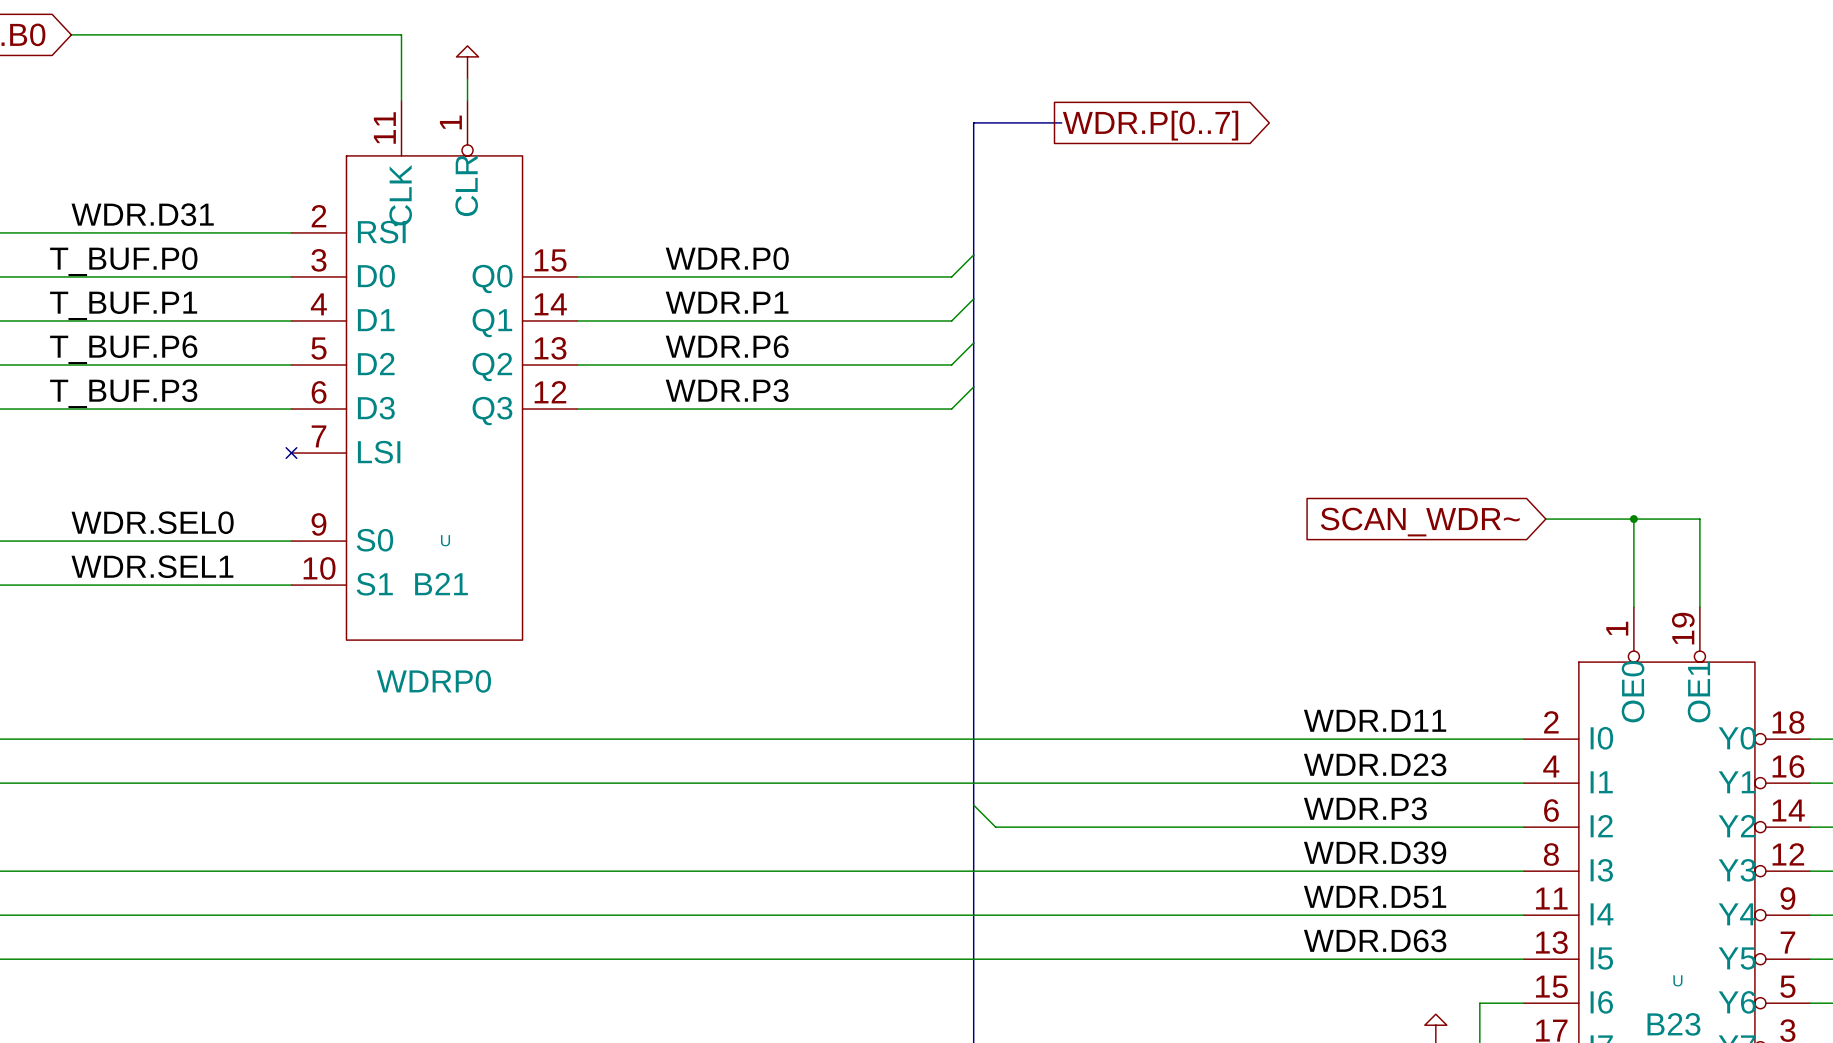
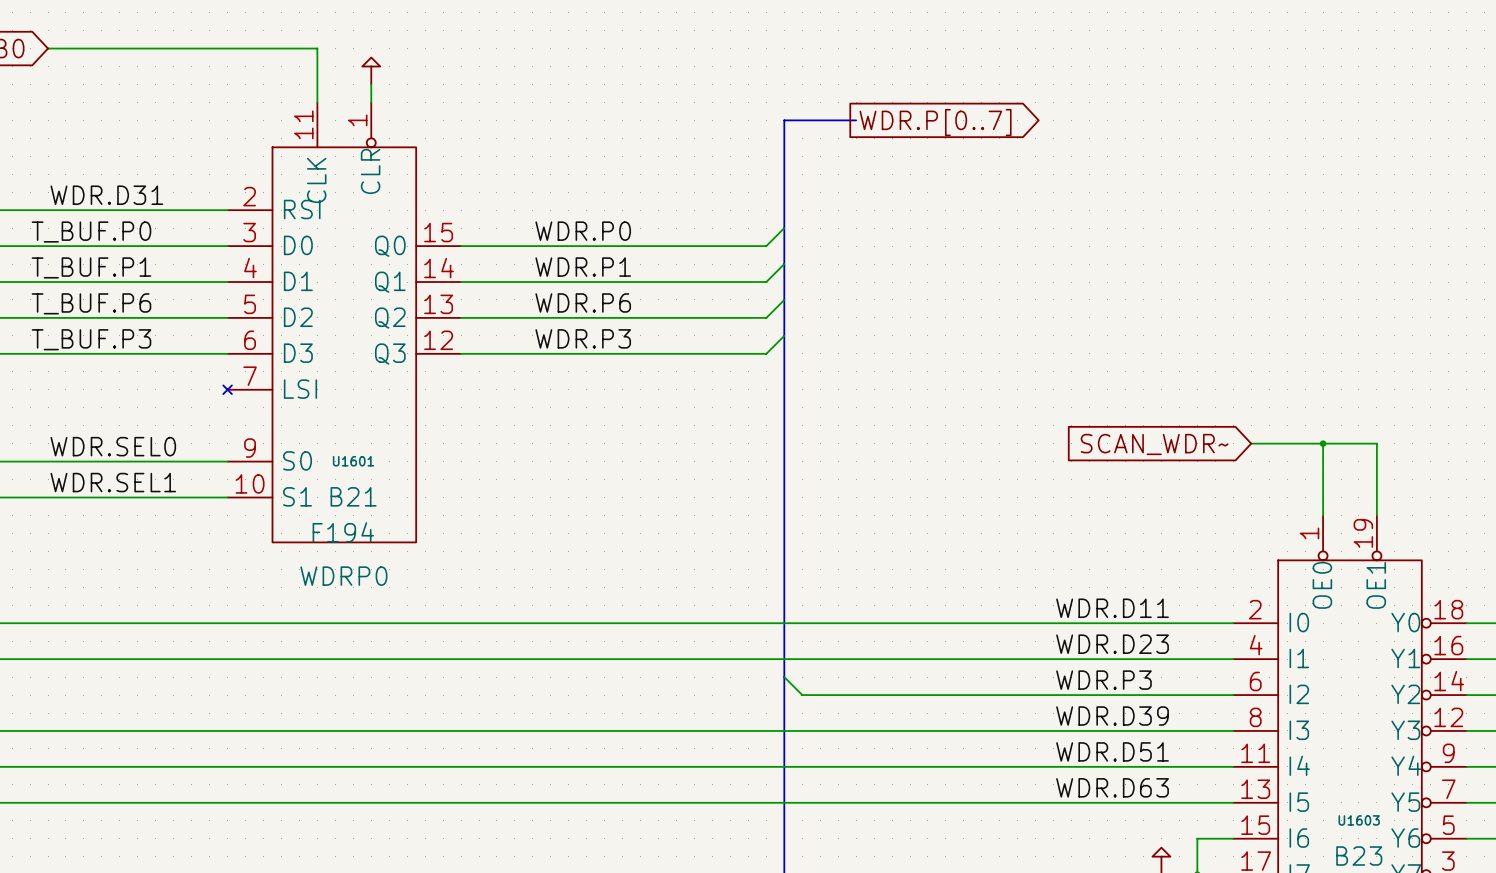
U name: U (445, 540) -> U1601 (353, 461)
U value: none -> F194 (343, 532)
U name: U (1677, 980) -> U1603 (1359, 820)

